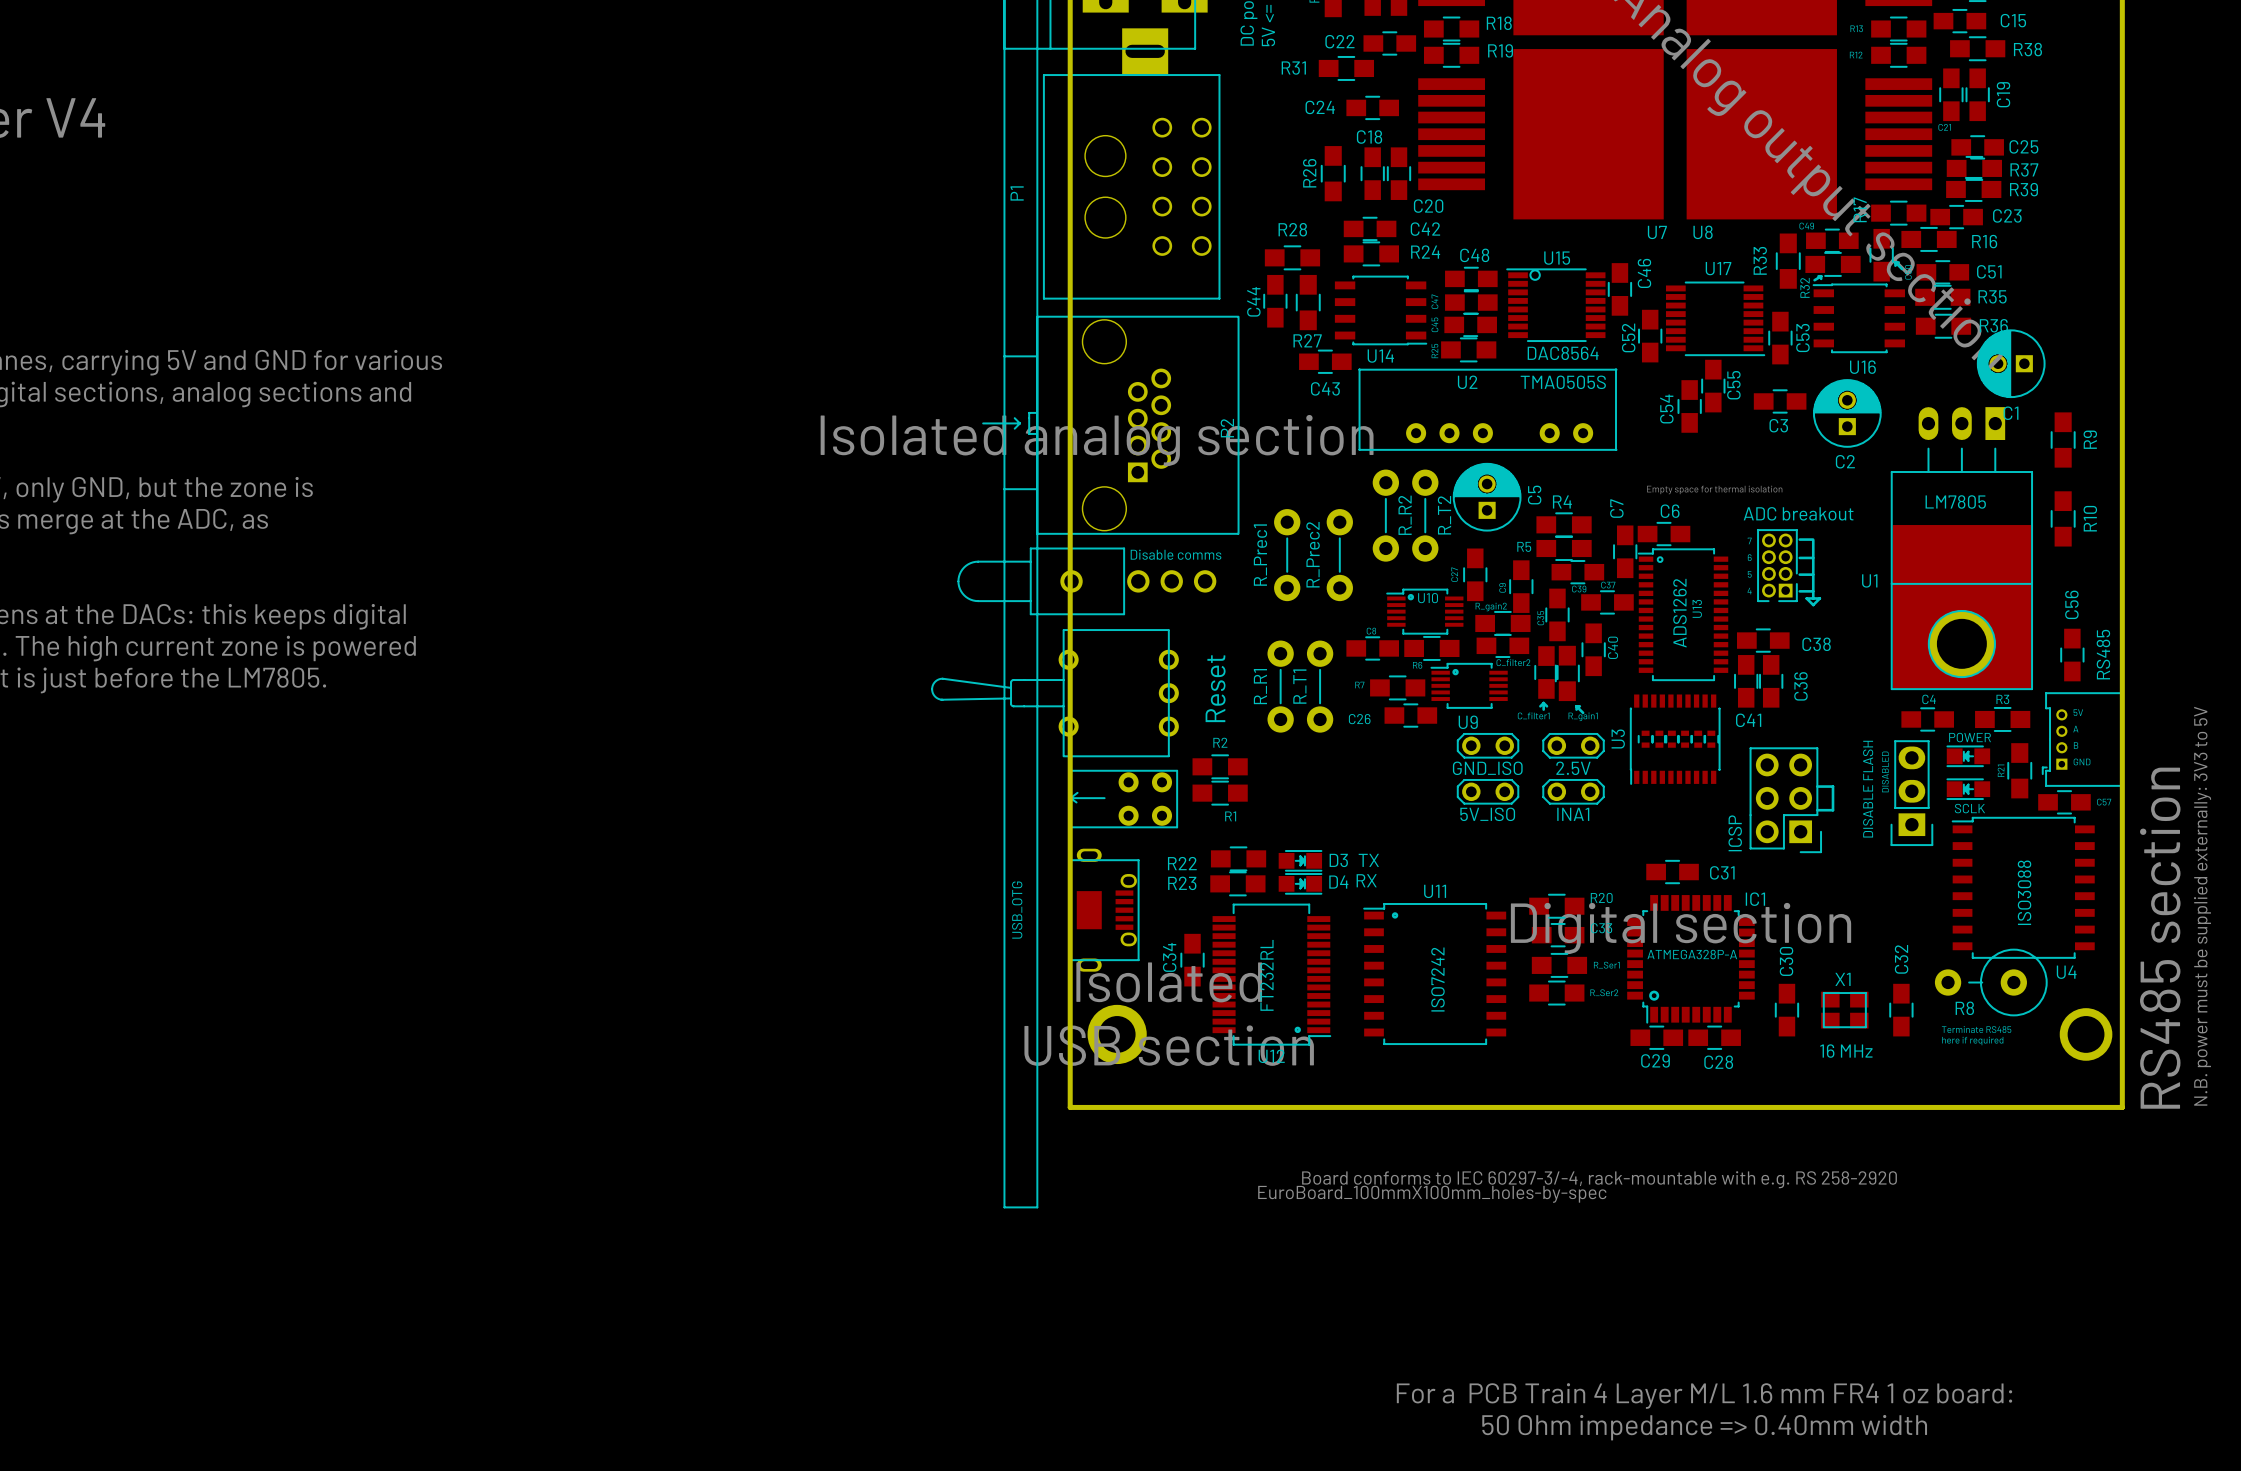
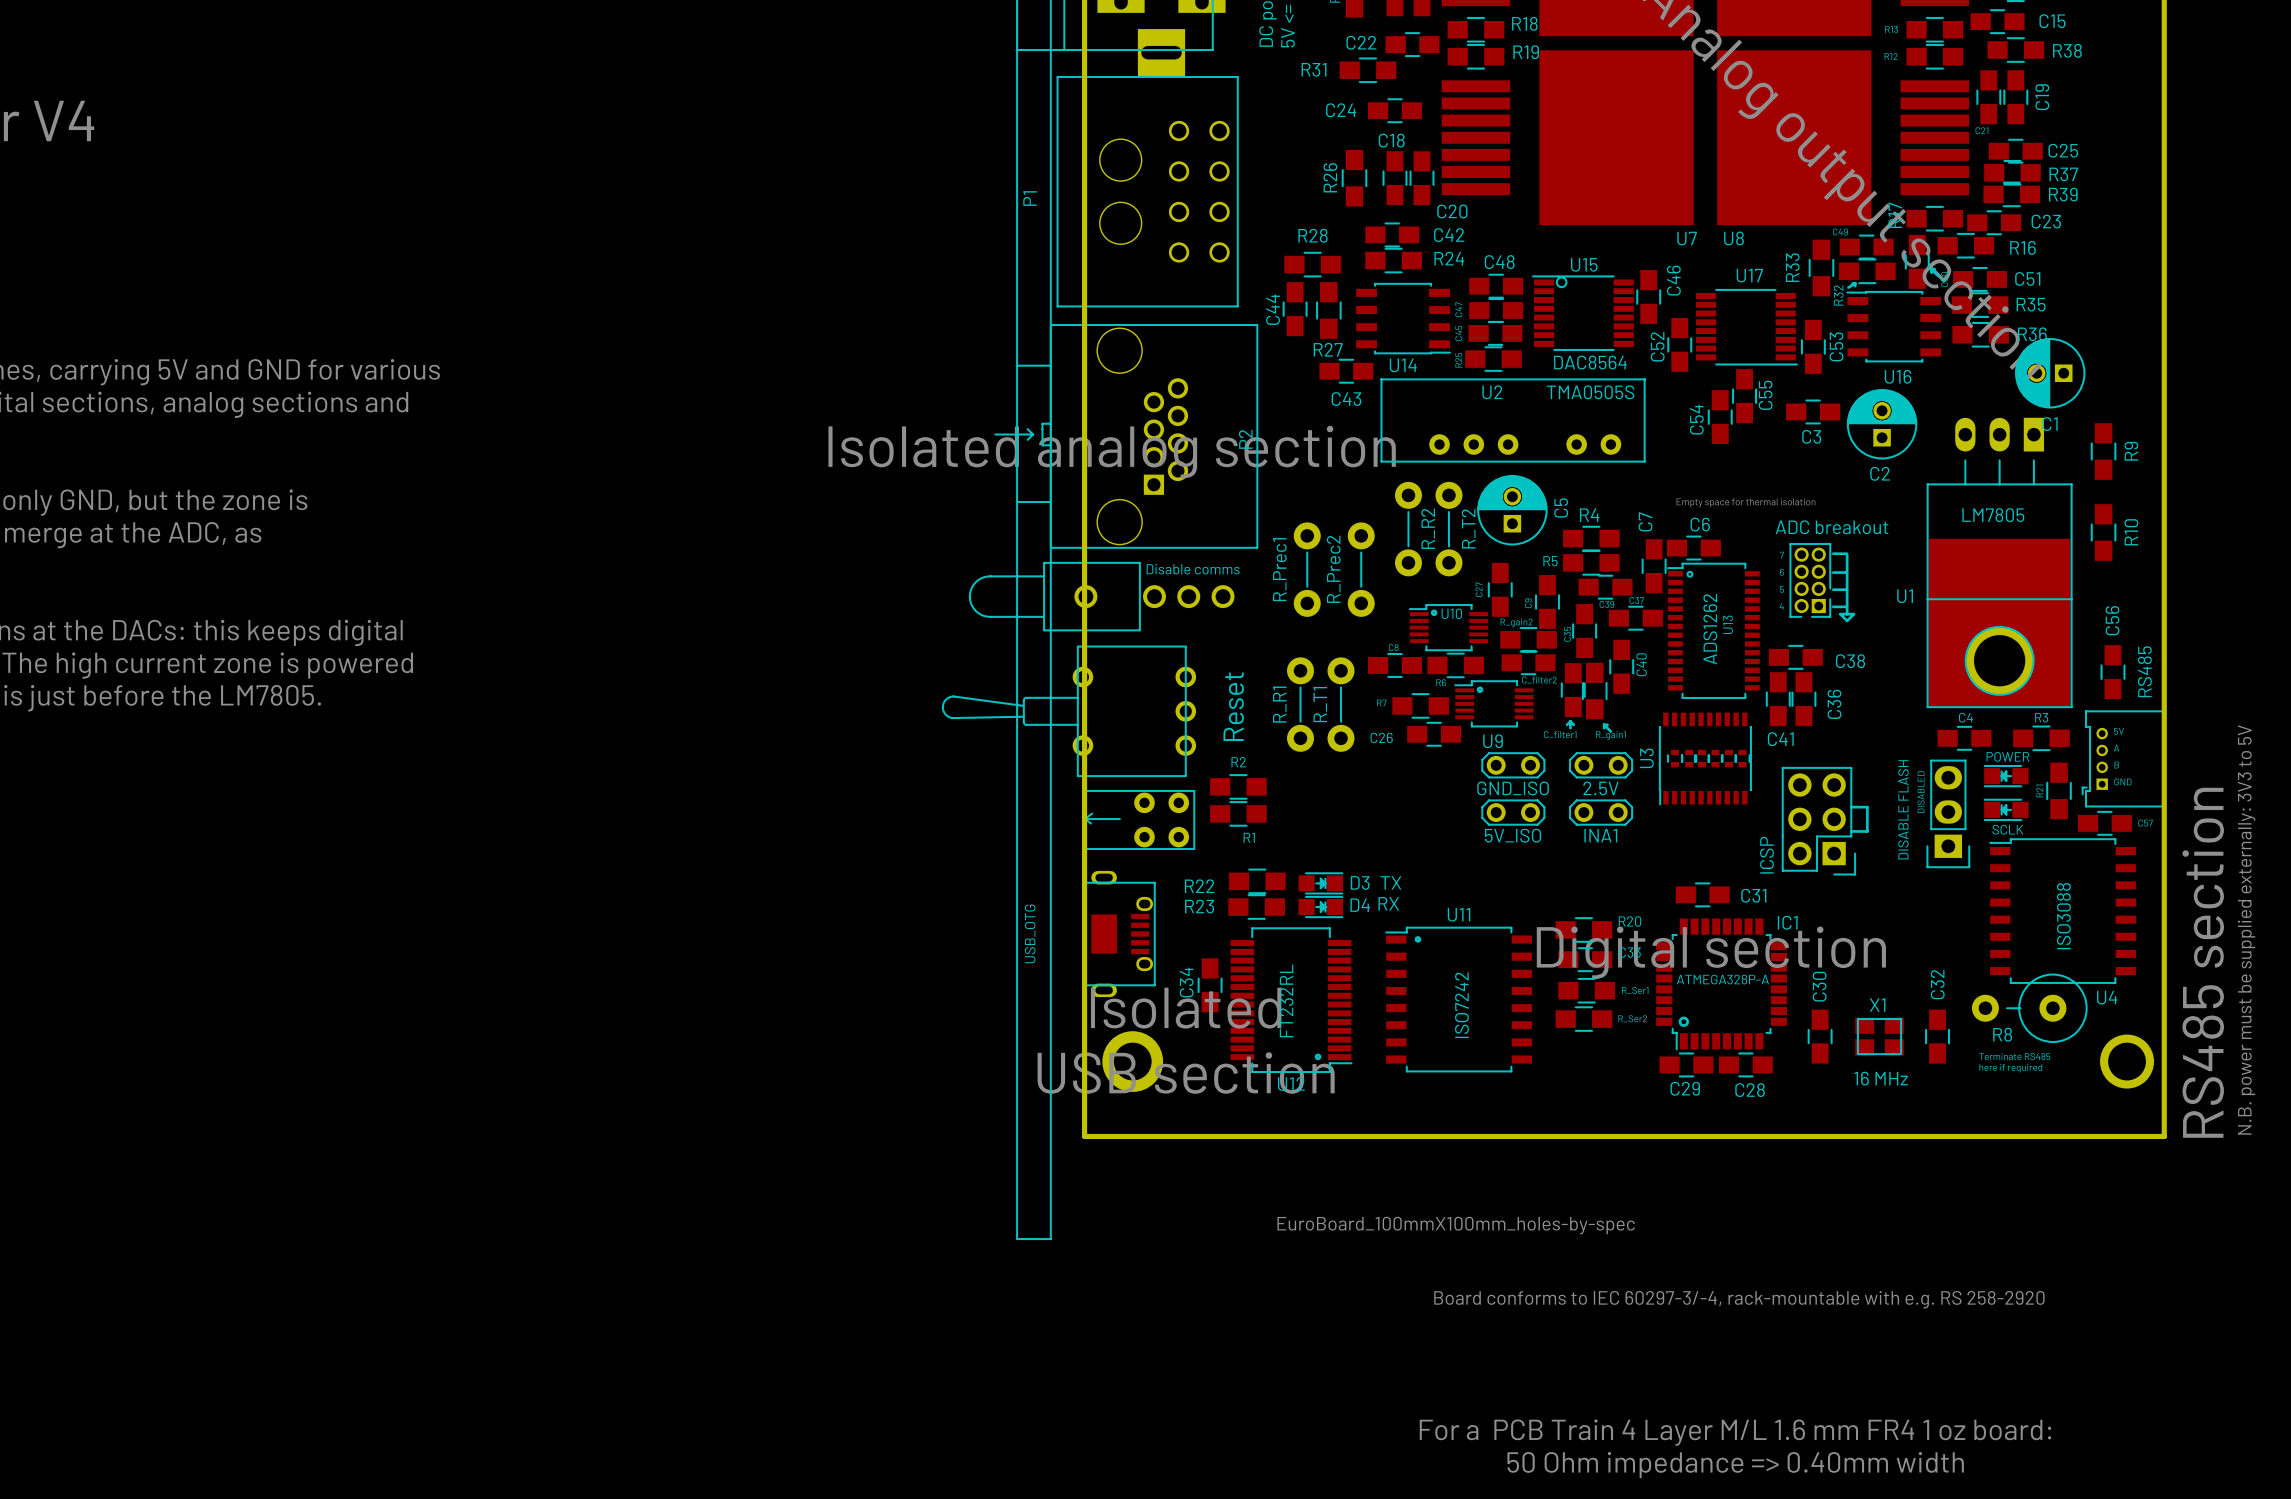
part text position: Board conforms to IEC 60297-3/-4, rack-mountable with e.g. RS 258-2920 (1599, 1179) -> Board conforms to IEC 60297-3/-4, rack-mountable with e.g. RS 258-2920 (1739, 1299)

